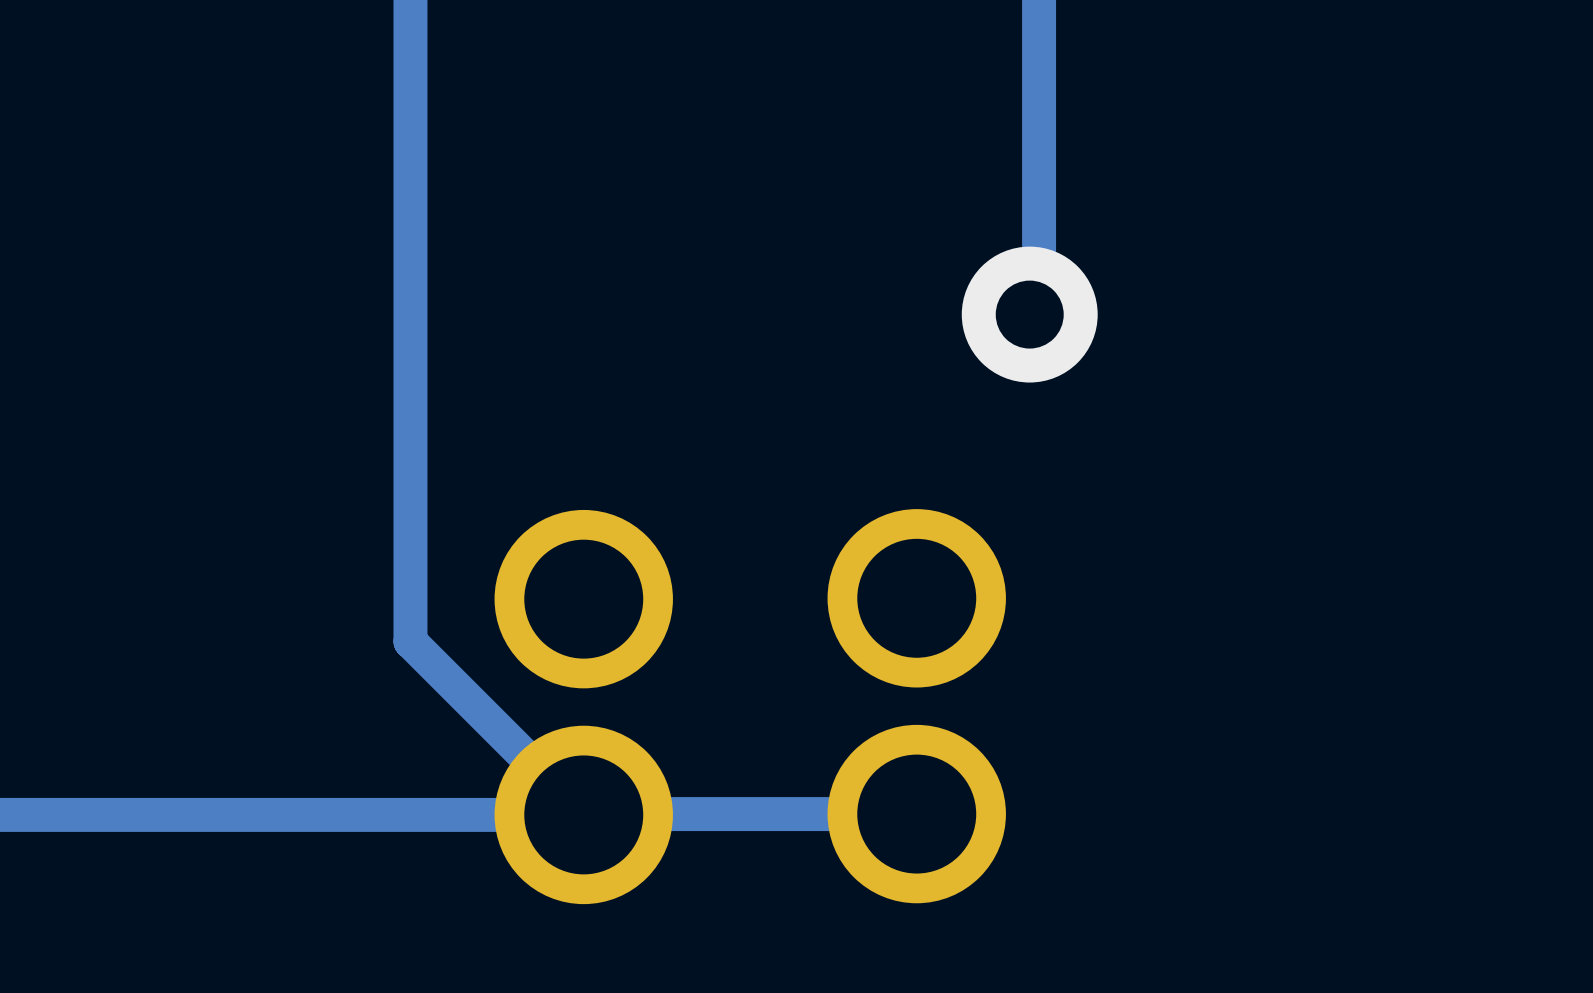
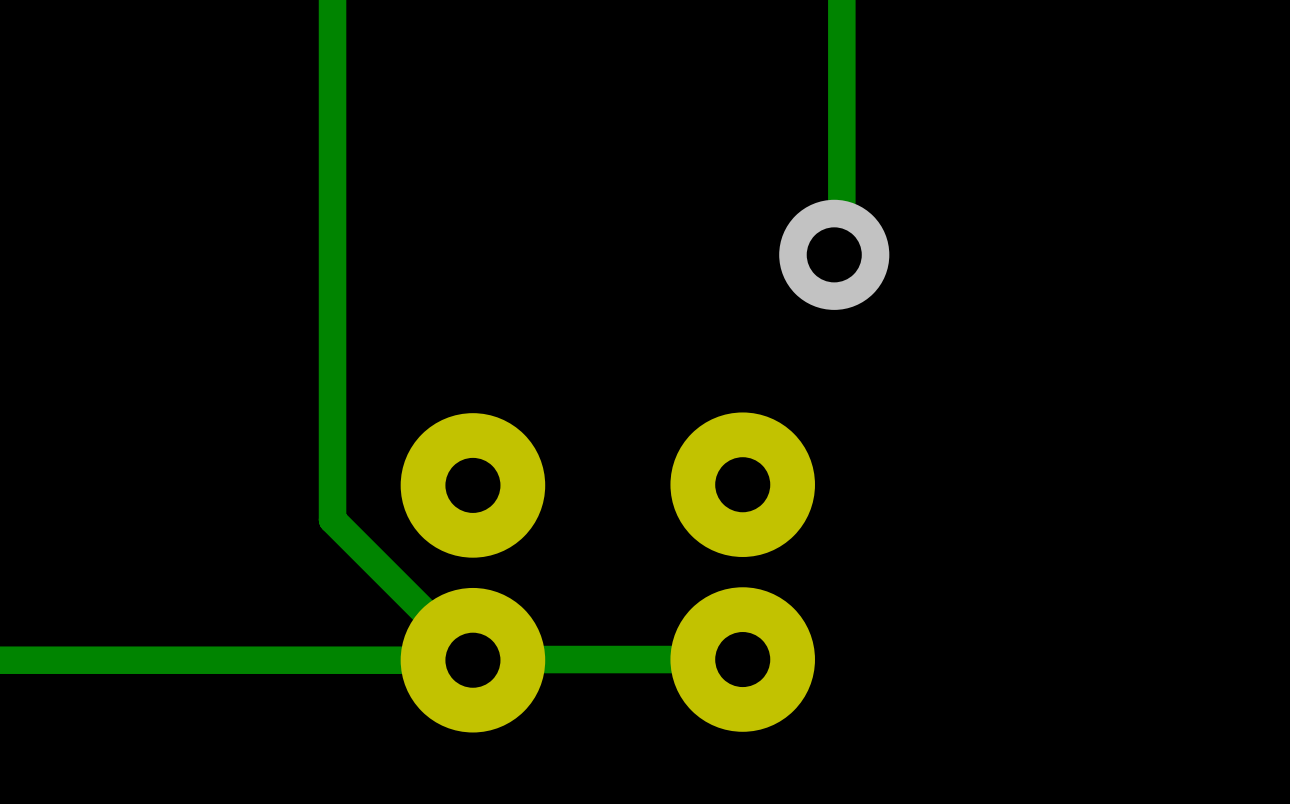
part footprint: [494, 509, 673, 905] -> [400, 413, 546, 733]
part footprint: [827, 509, 1006, 904] -> [670, 412, 815, 732]

